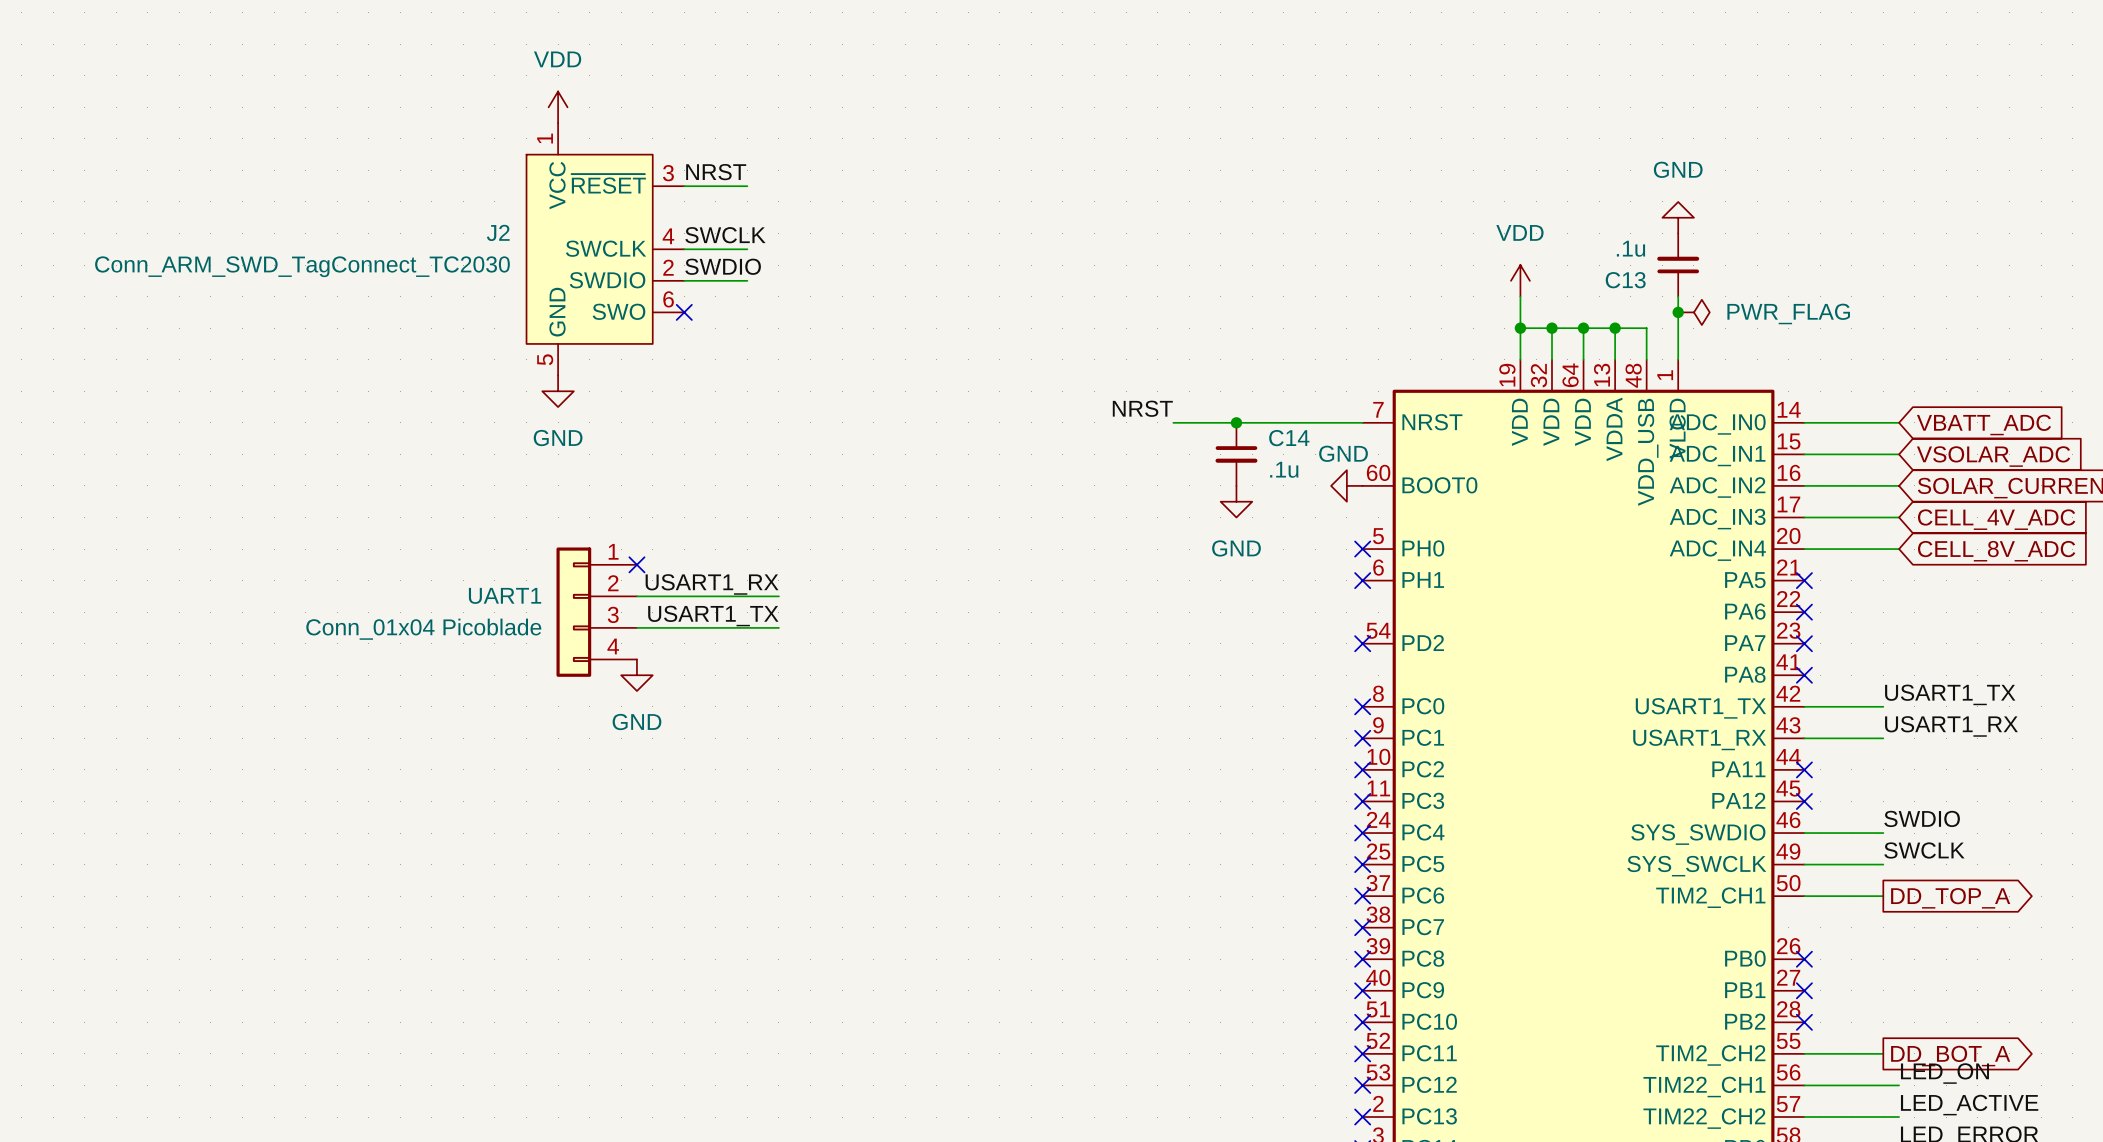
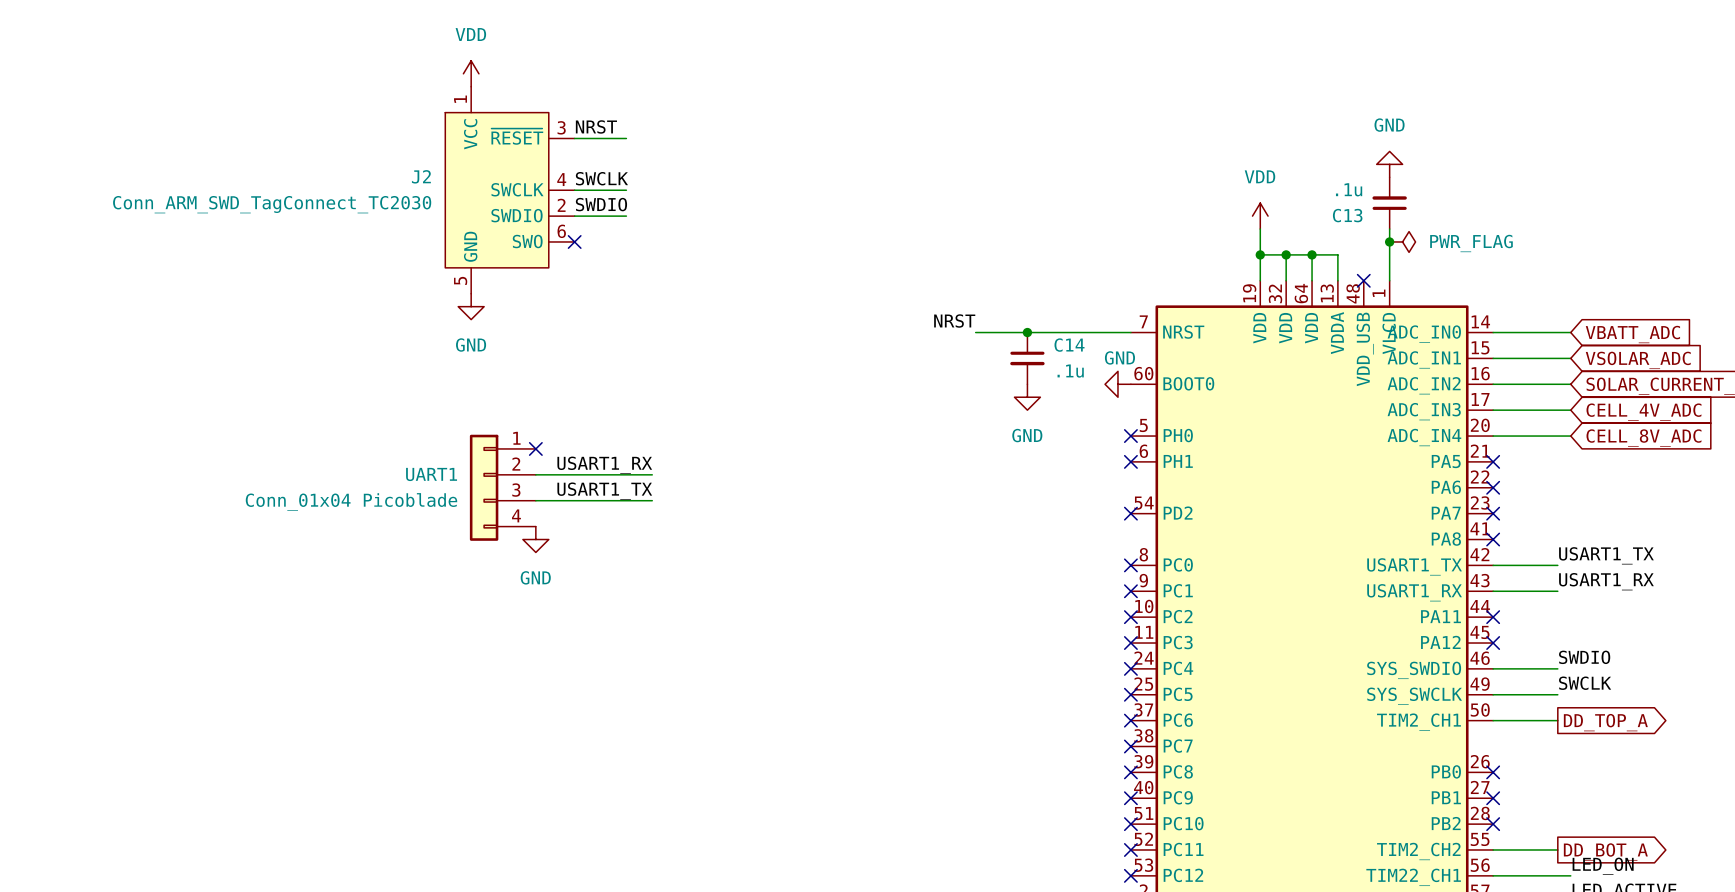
wire: (1615, 328) (1646, 328) (1646, 359) -> none
junction: (1615, 328) -> none
no-connect mark: none -> (1363, 280)

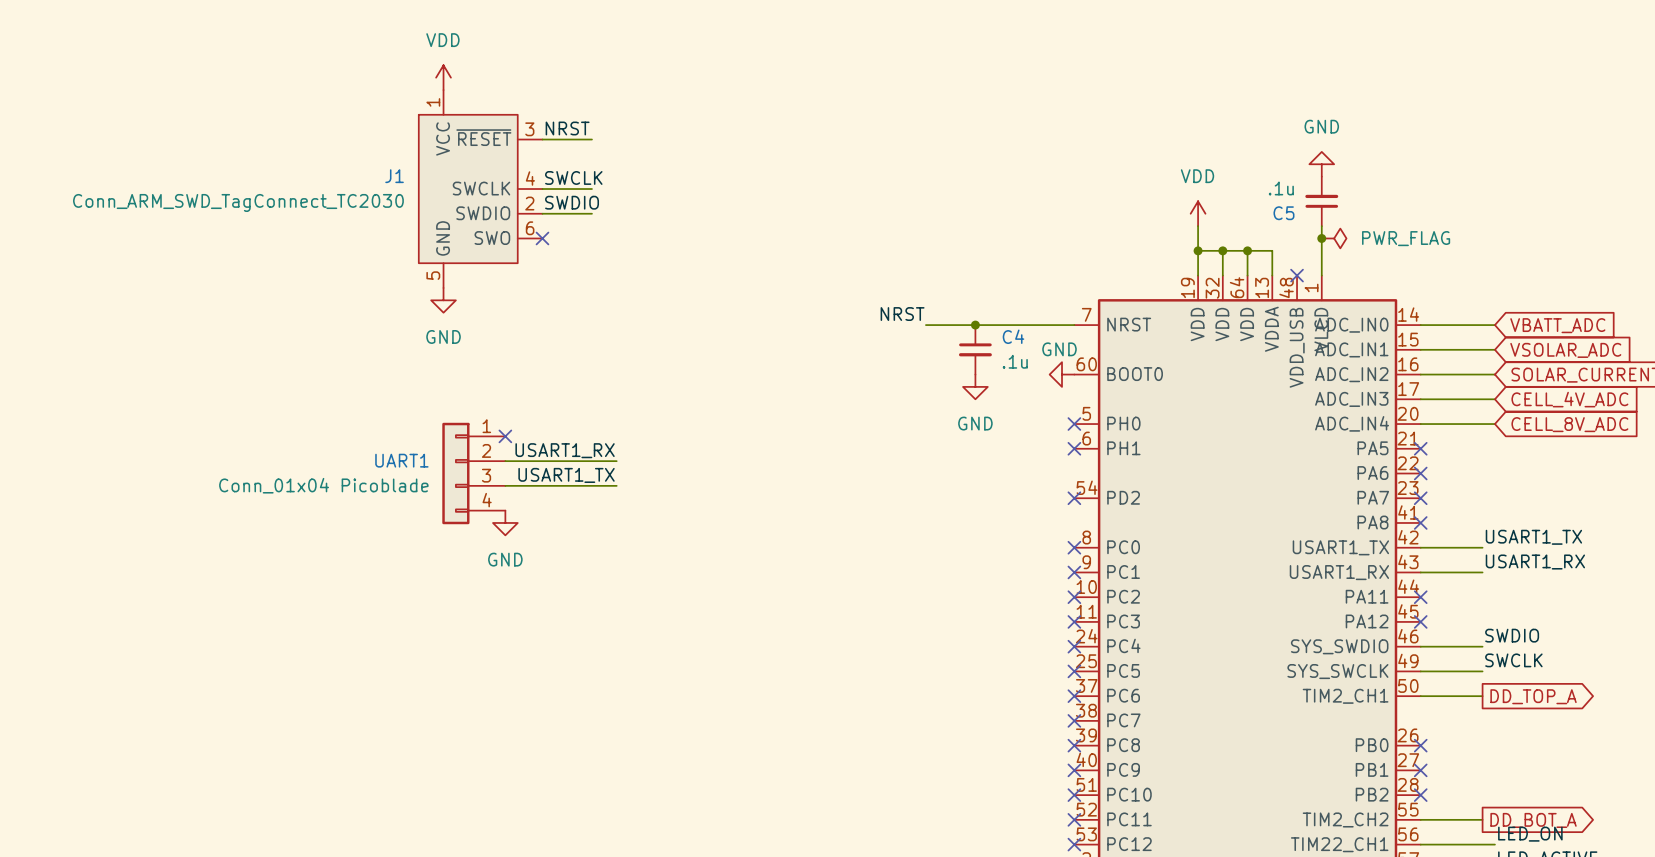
J2 name: J2 (421, 176) -> J1 (394, 176)
C13 name: C13 (1347, 215) -> C5 (1283, 213)
C14 name: C14 (1069, 345) -> C4 (1013, 336)

